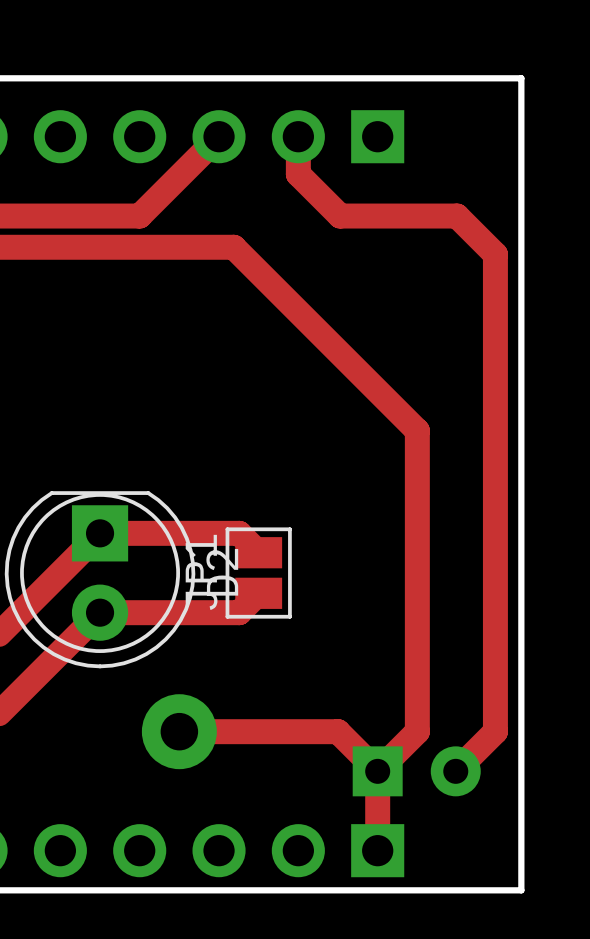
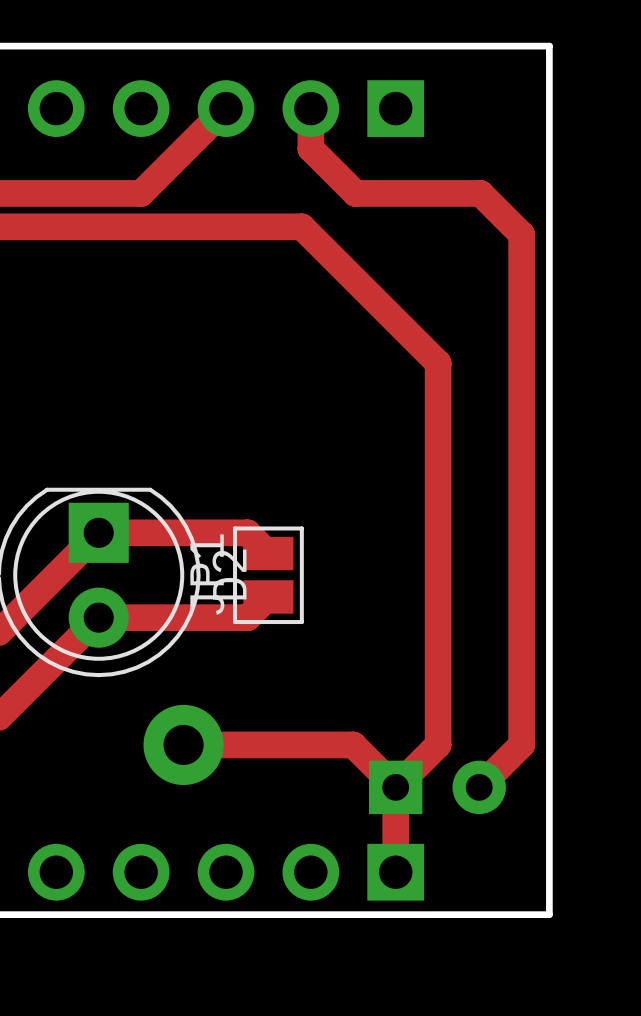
track: (233, 247) (417, 430) -> (241, 226) (301, 226) (438, 363) (438, 423)

